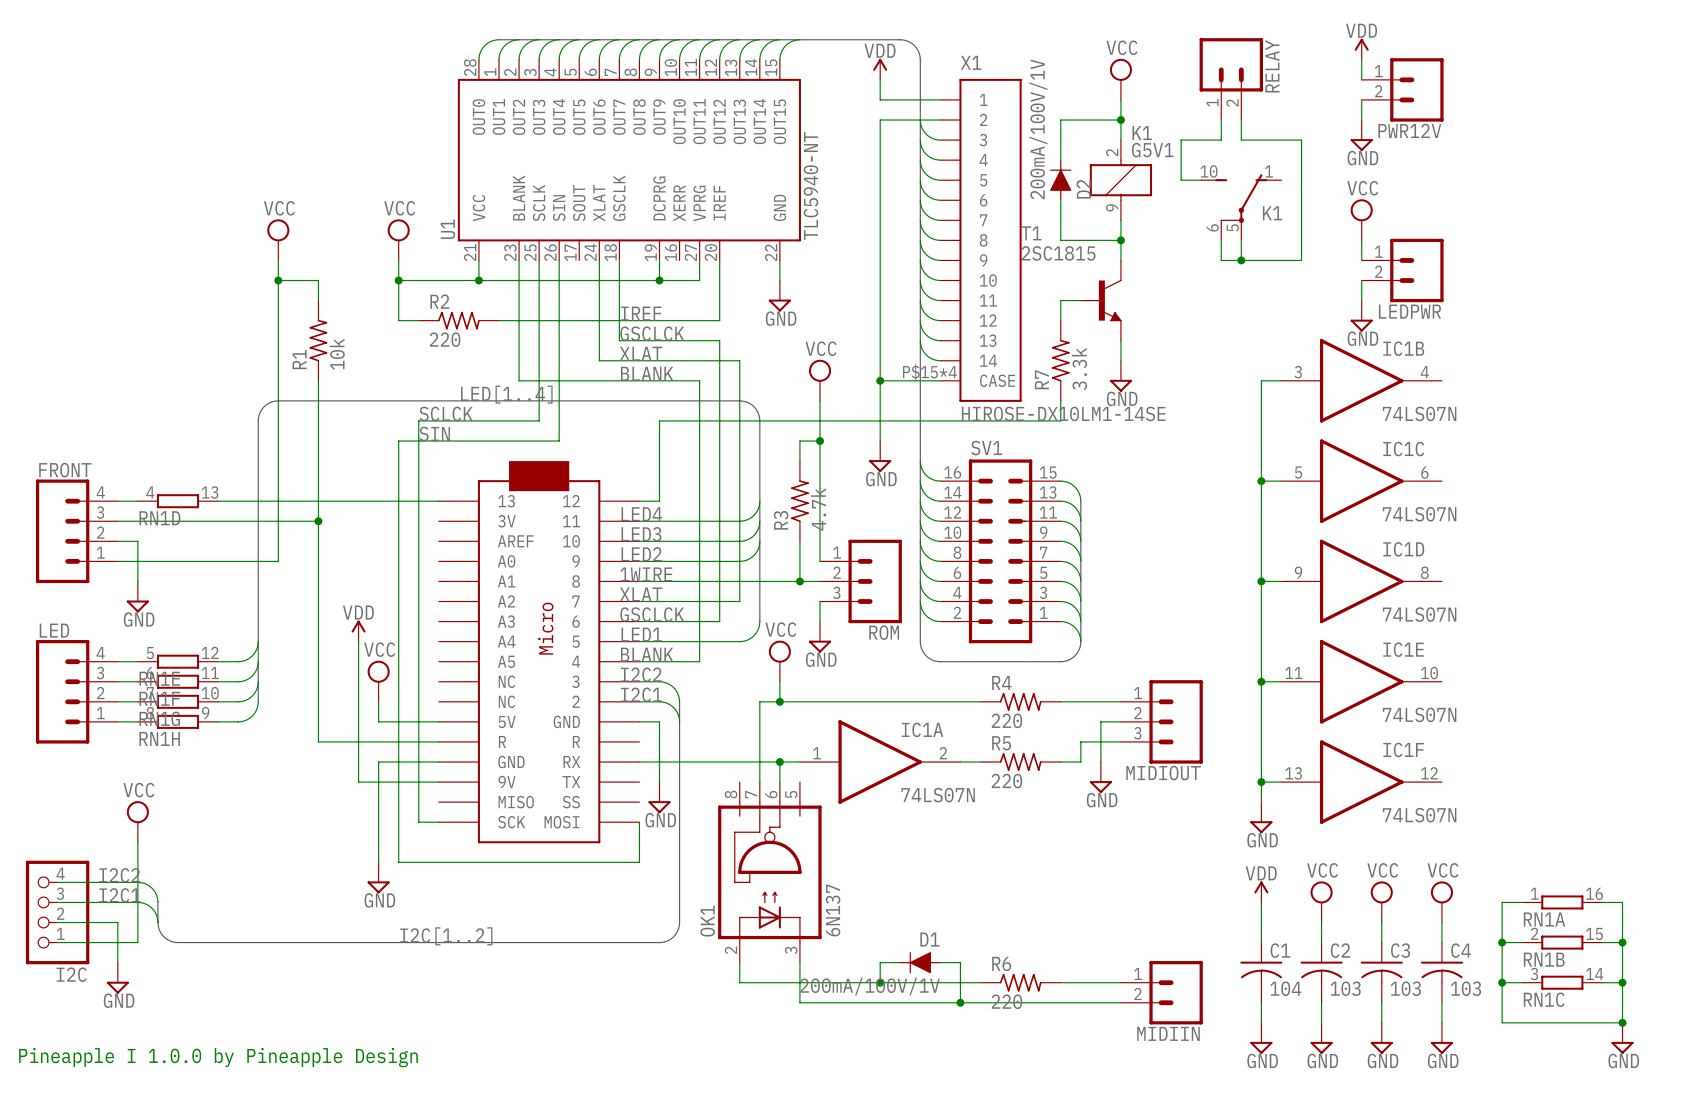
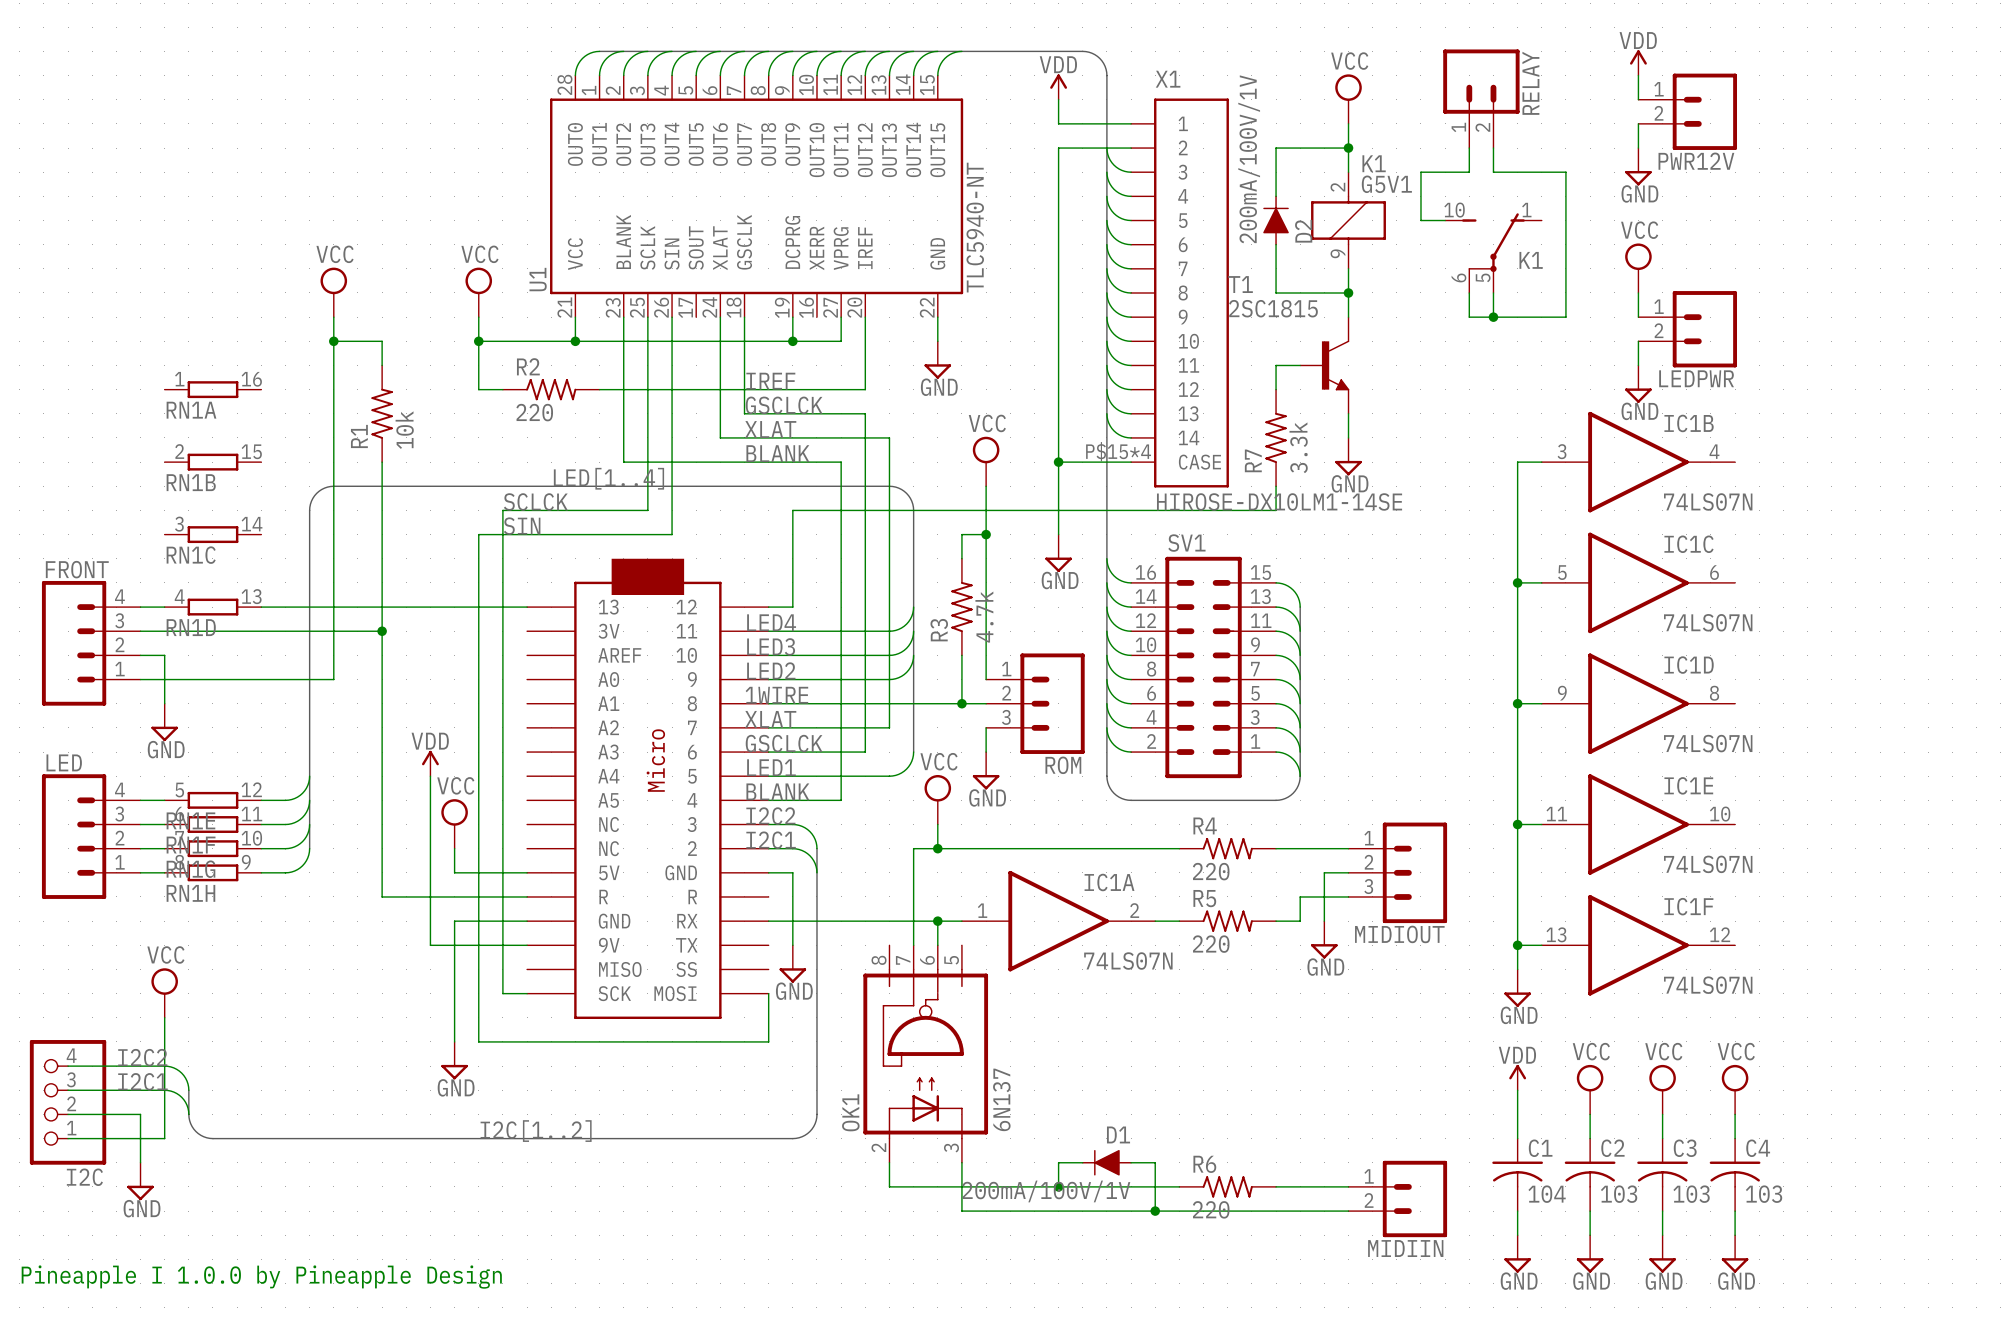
wire: (1522, 902) (1502, 902) (1502, 1022) (1622, 1022) (1622, 902) (1602, 902) -> none
RN1A position: (1562, 902) -> (212, 389)
wire: (1502, 942) (1522, 942) -> none
junction: (1502, 942) -> none
RN1B position: (1562, 942) -> (212, 462)
wire: (1602, 942) (1622, 942) -> none
junction: (1622, 942) -> none
wire: (1502, 982) (1522, 982) -> none
junction: (1502, 982) -> none
RN1C position: (1562, 982) -> (212, 534)
wire: (1602, 982) (1622, 982) -> none
junction: (1622, 982) -> none
junction: (1622, 1022) -> none
power symbol: GND (1622, 1038) -> none

